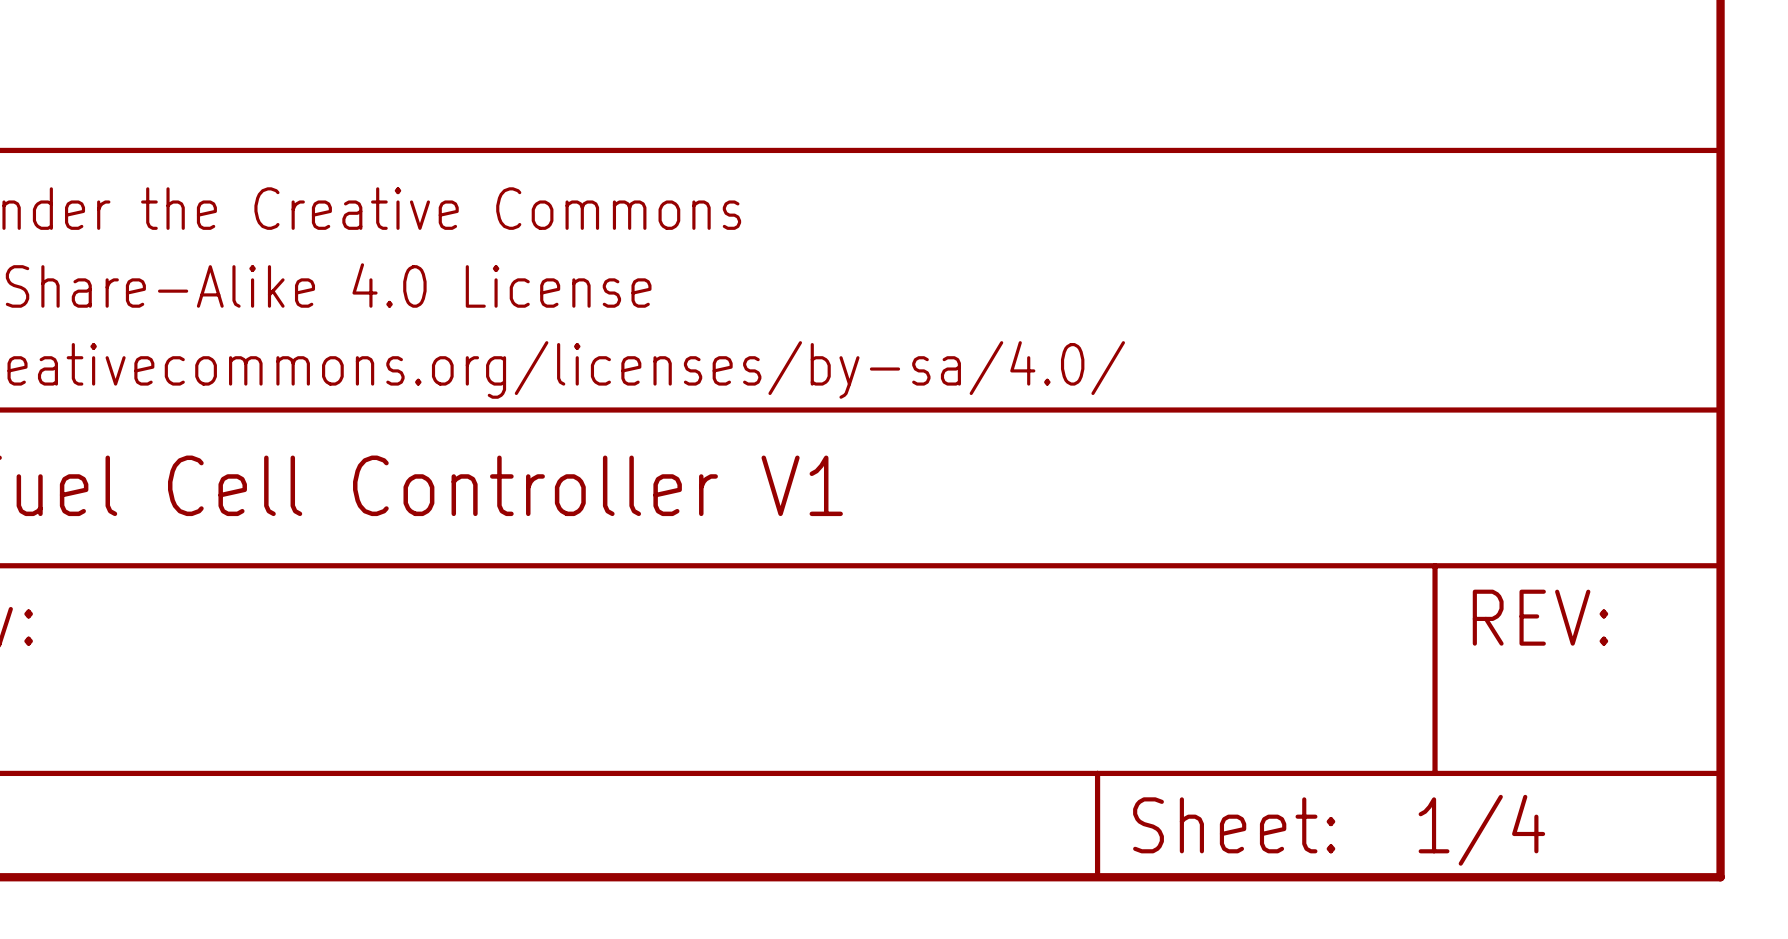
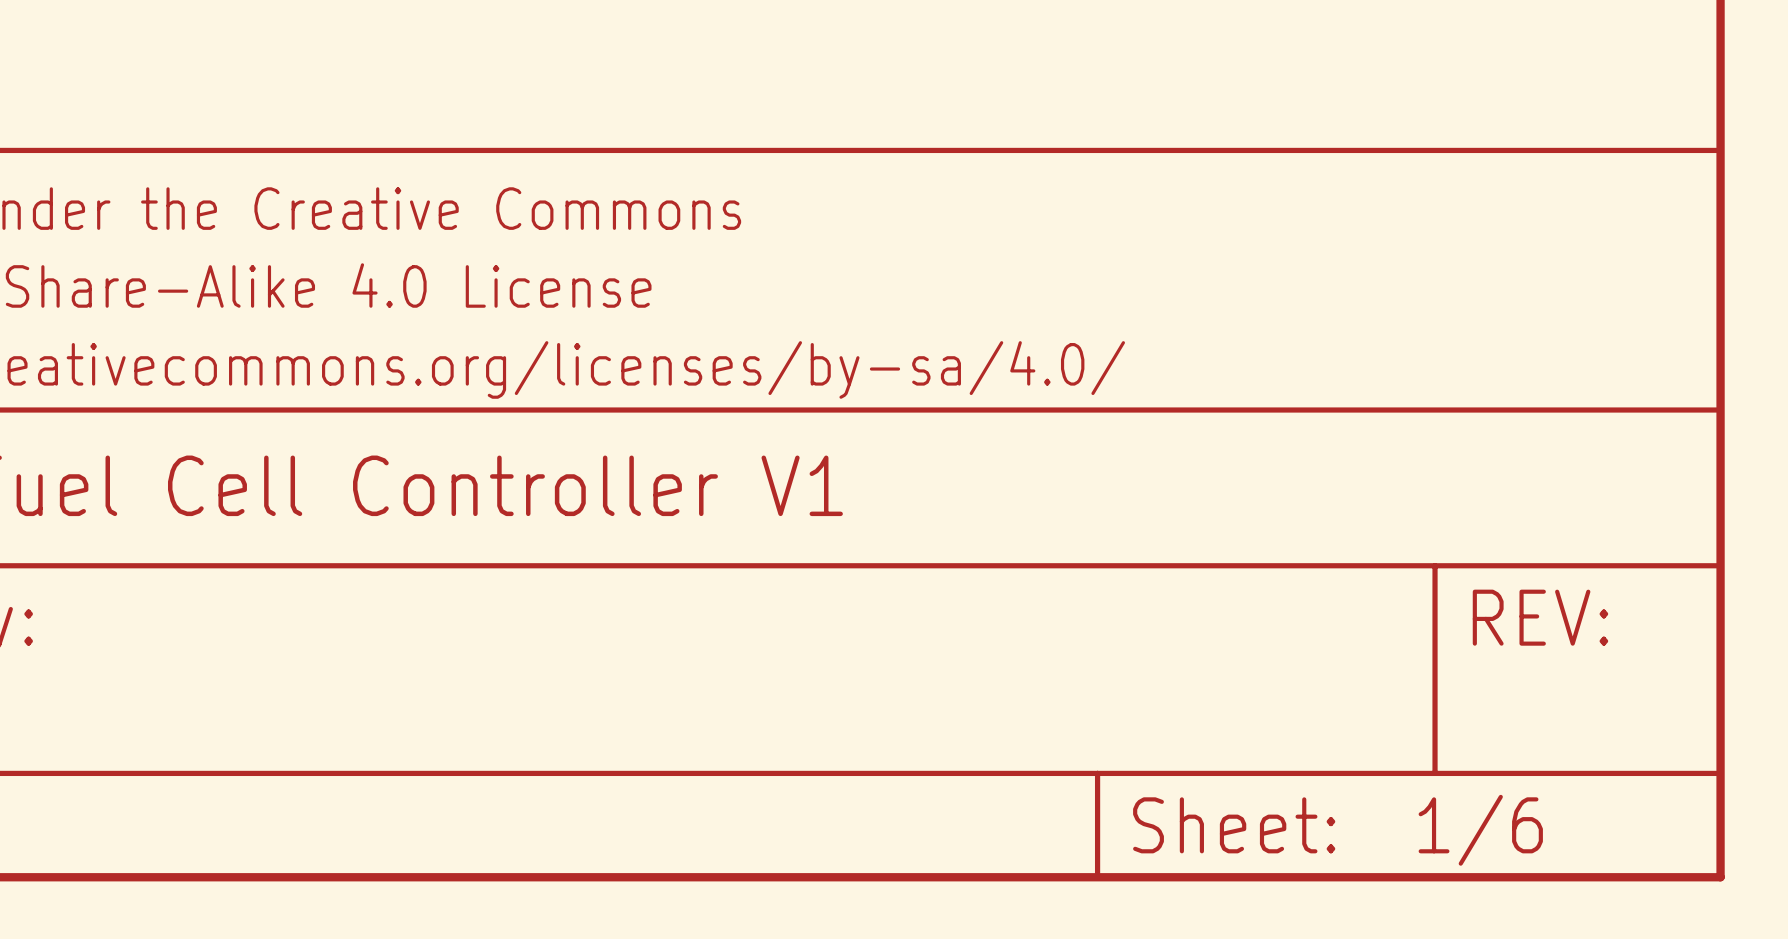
part text: 1/4 (1481, 830) -> 1/6 (1480, 830)

